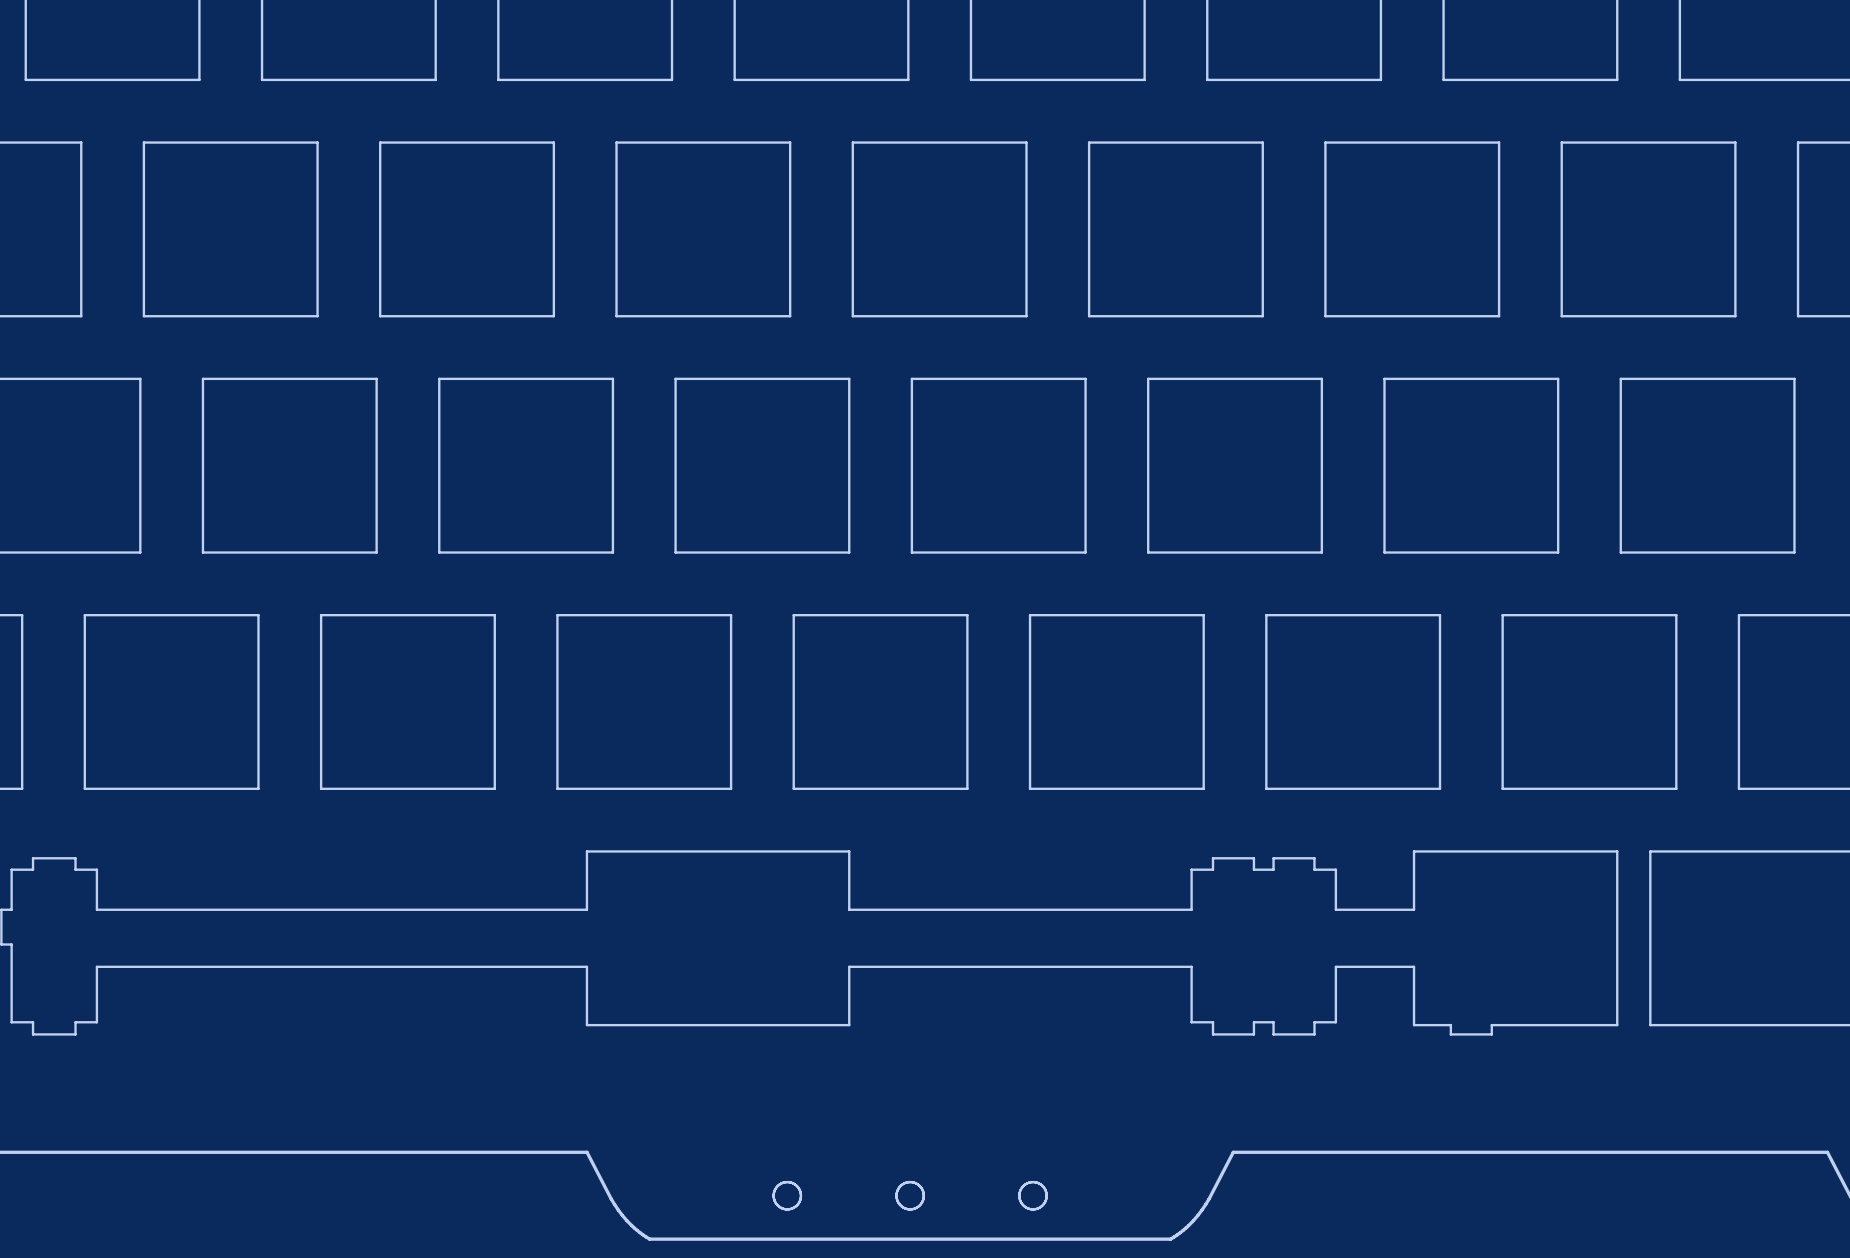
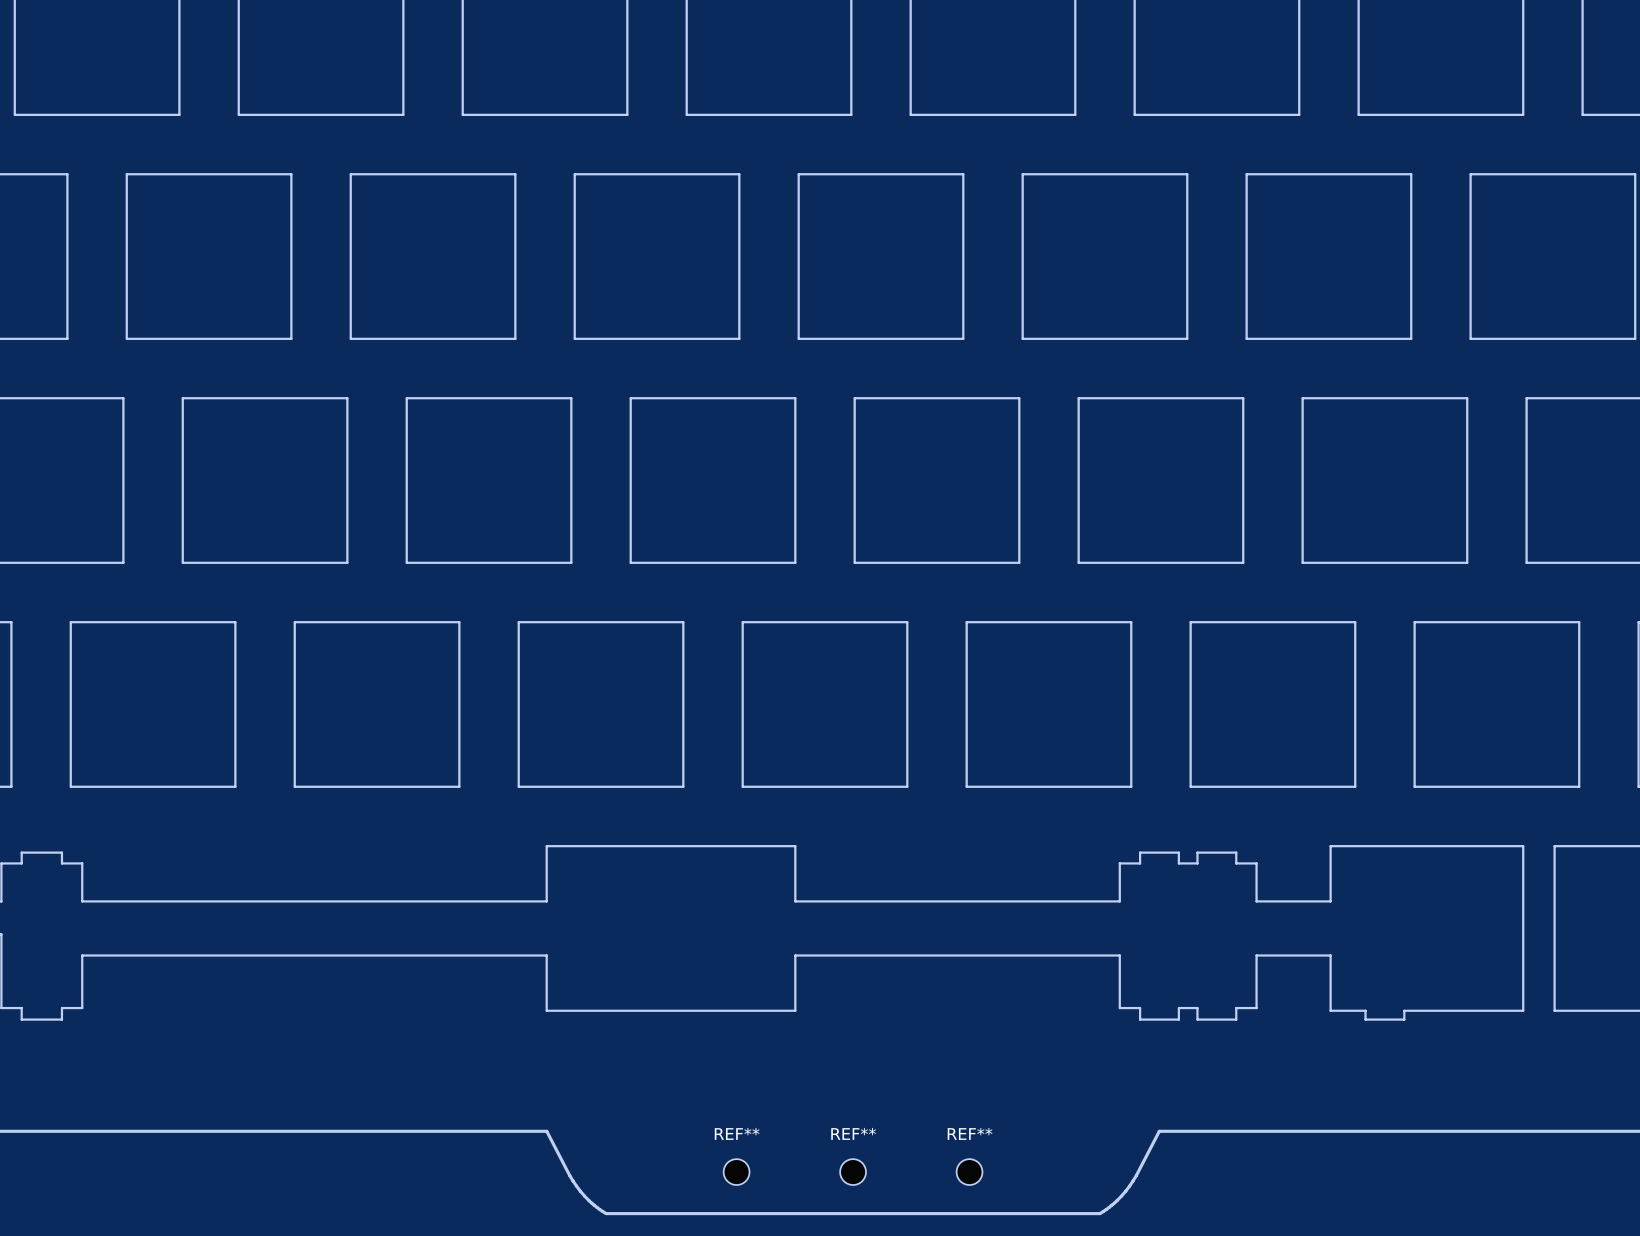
board edge: (786, 1182) (796, 1185) (800, 1195) (797, 1204) (788, 1209) (778, 1205) (773, 1196) (777, 1186) (786, 1182) -> none
board edge: (909, 1182) (900, 1186) (896, 1196) (900, 1205) (910, 1209) (920, 1204) (923, 1195) (919, 1185) (909, 1182) -> none
board edge: (1032, 1182) (1022, 1186) (1019, 1196) (1023, 1205) (1033, 1209) (1043, 1204) (1046, 1195) (1042, 1185) (1032, 1182) -> none
REF**: none -> (736, 1172)
REF**: none -> (853, 1172)
REF**: none -> (969, 1172)

